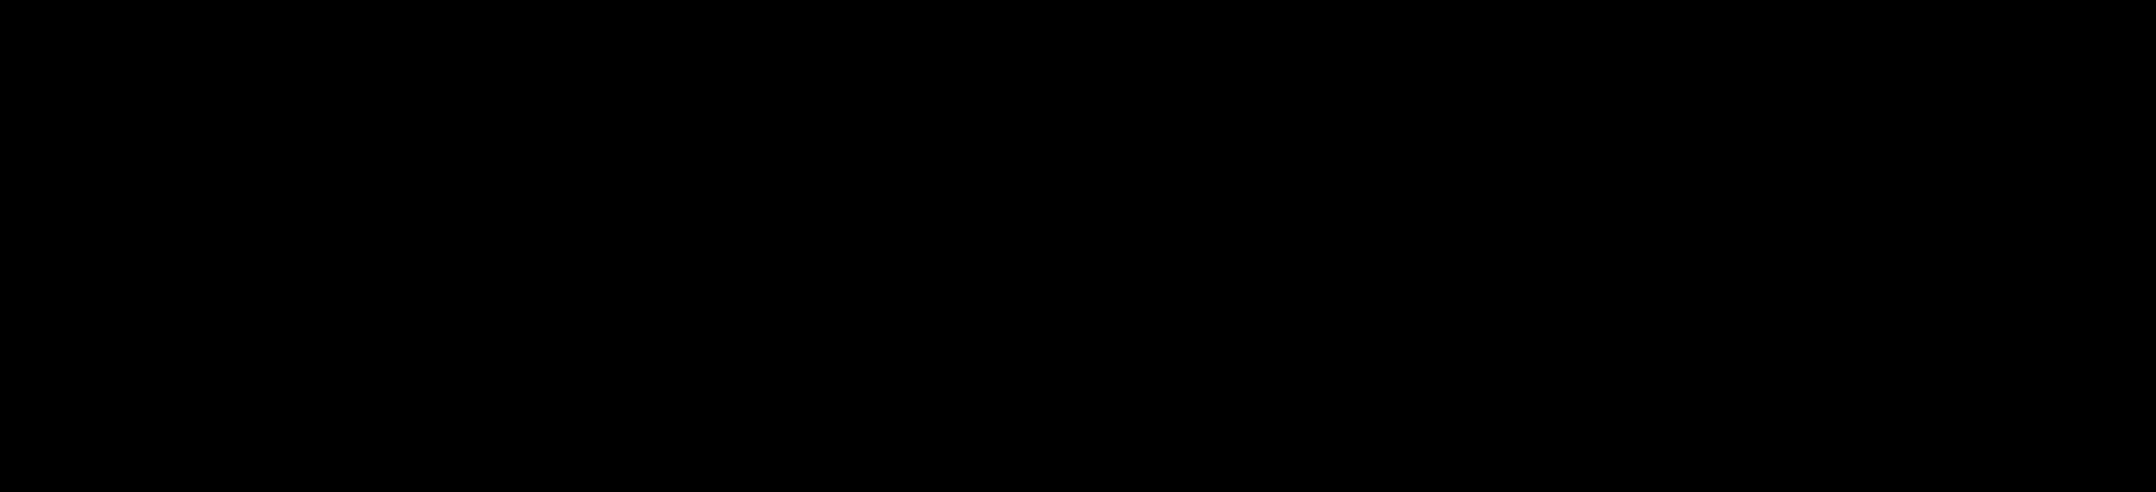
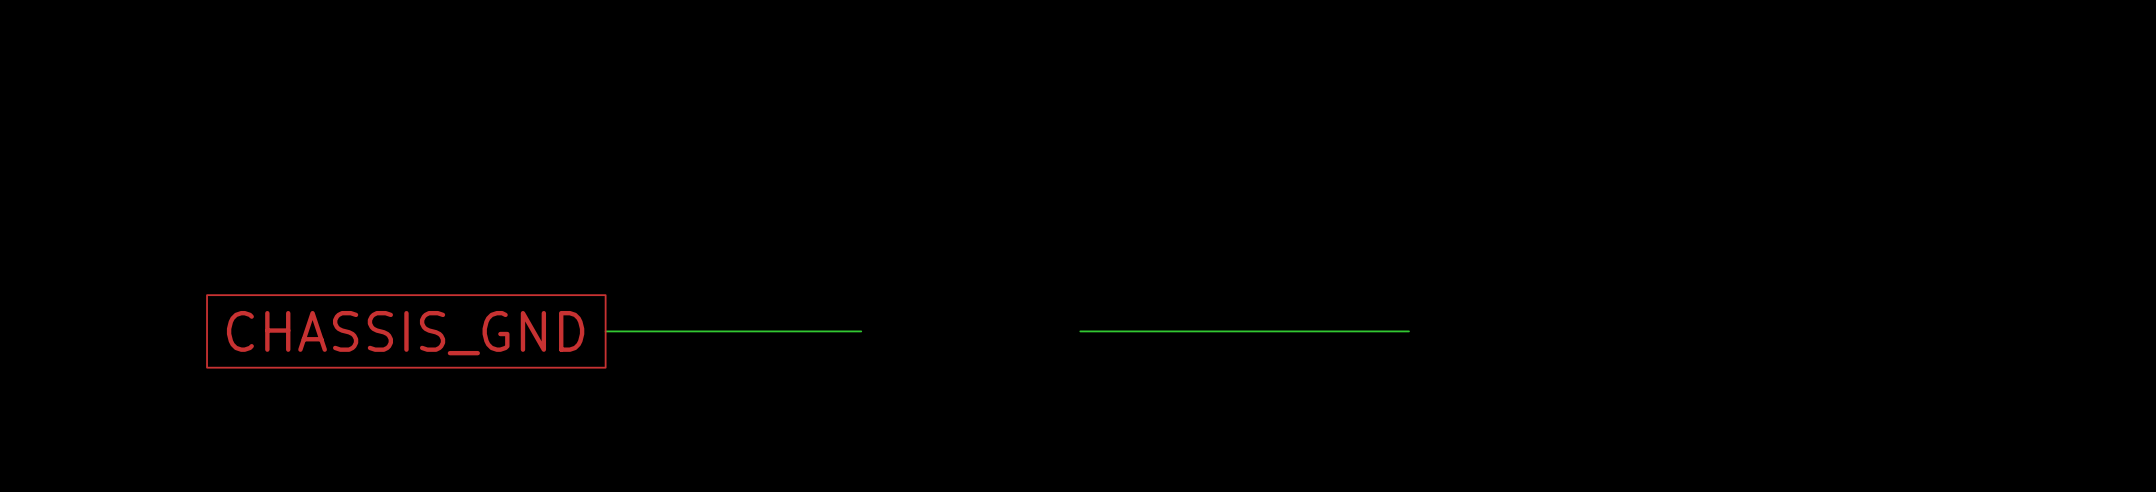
wire: none -> (605, 331) (861, 331)
wire: none -> (1080, 331) (1408, 331)
global label: none -> CHASSIS_GND (405, 333)

